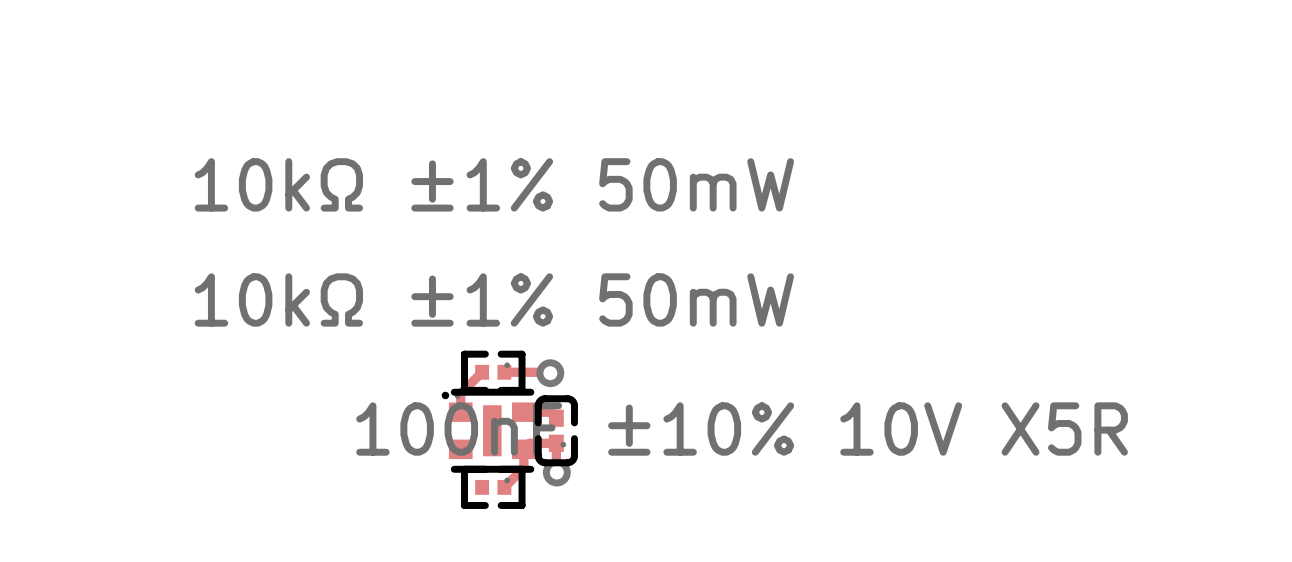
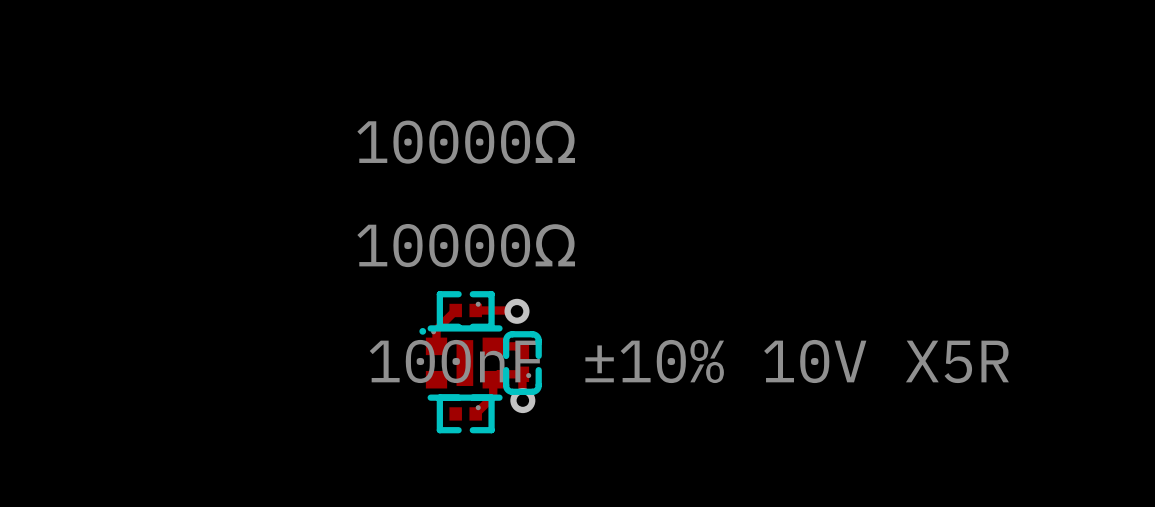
part value: 10kΩ ±1% 50mW (494, 184) -> 10000Ω (466, 142)
part value: 10kΩ ±1% 50mW (494, 299) -> 10000Ω (466, 245)

